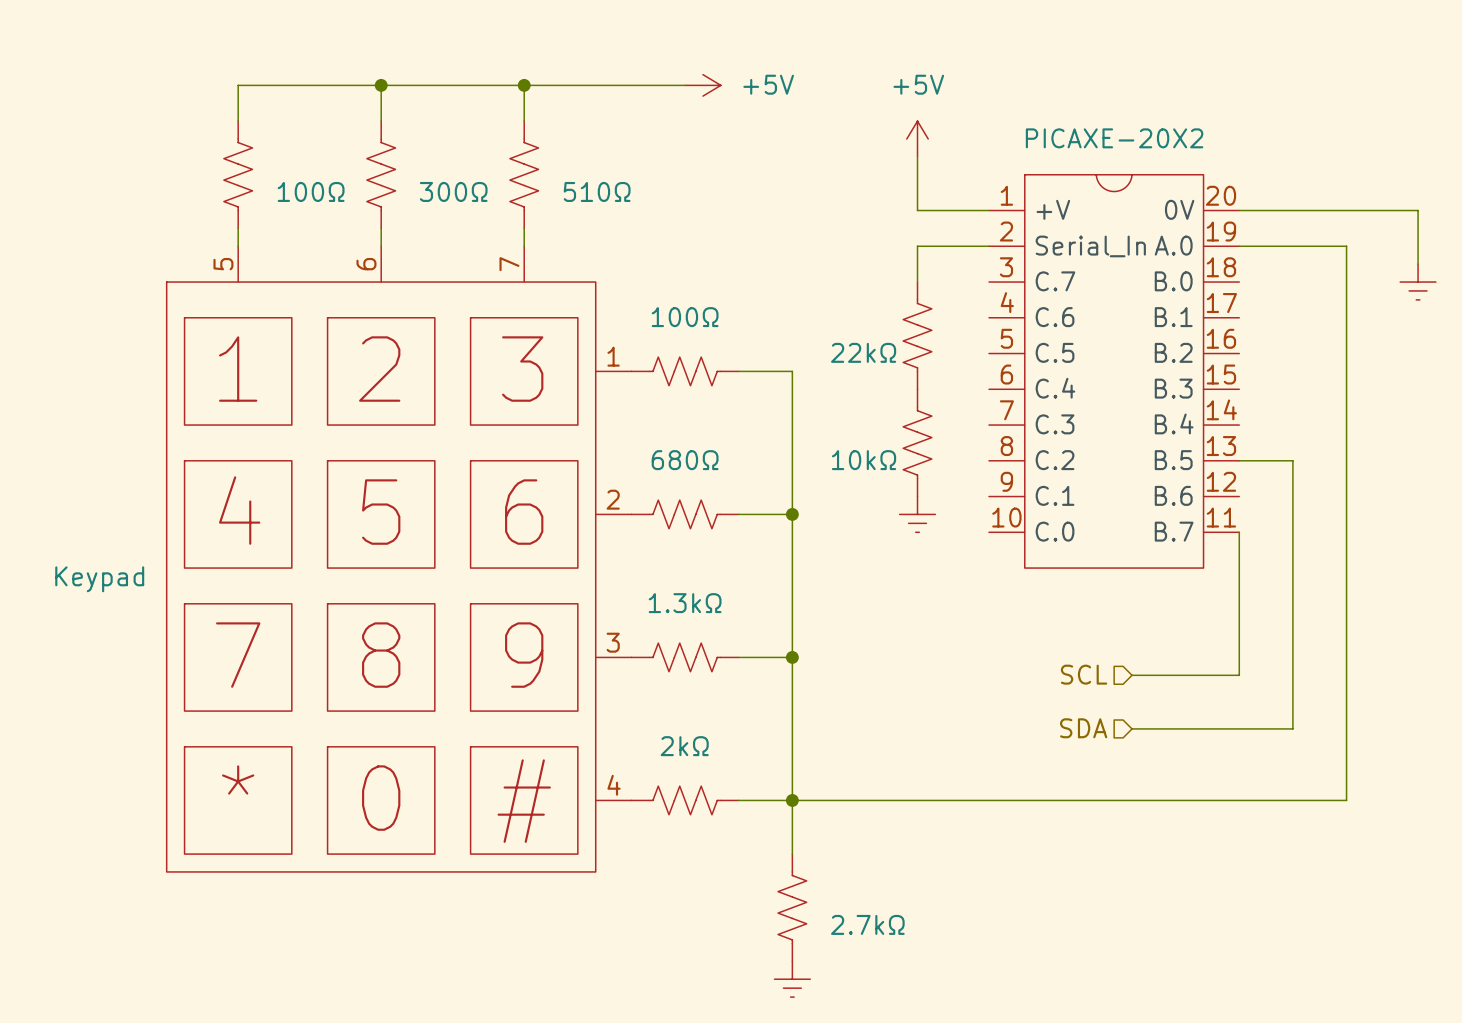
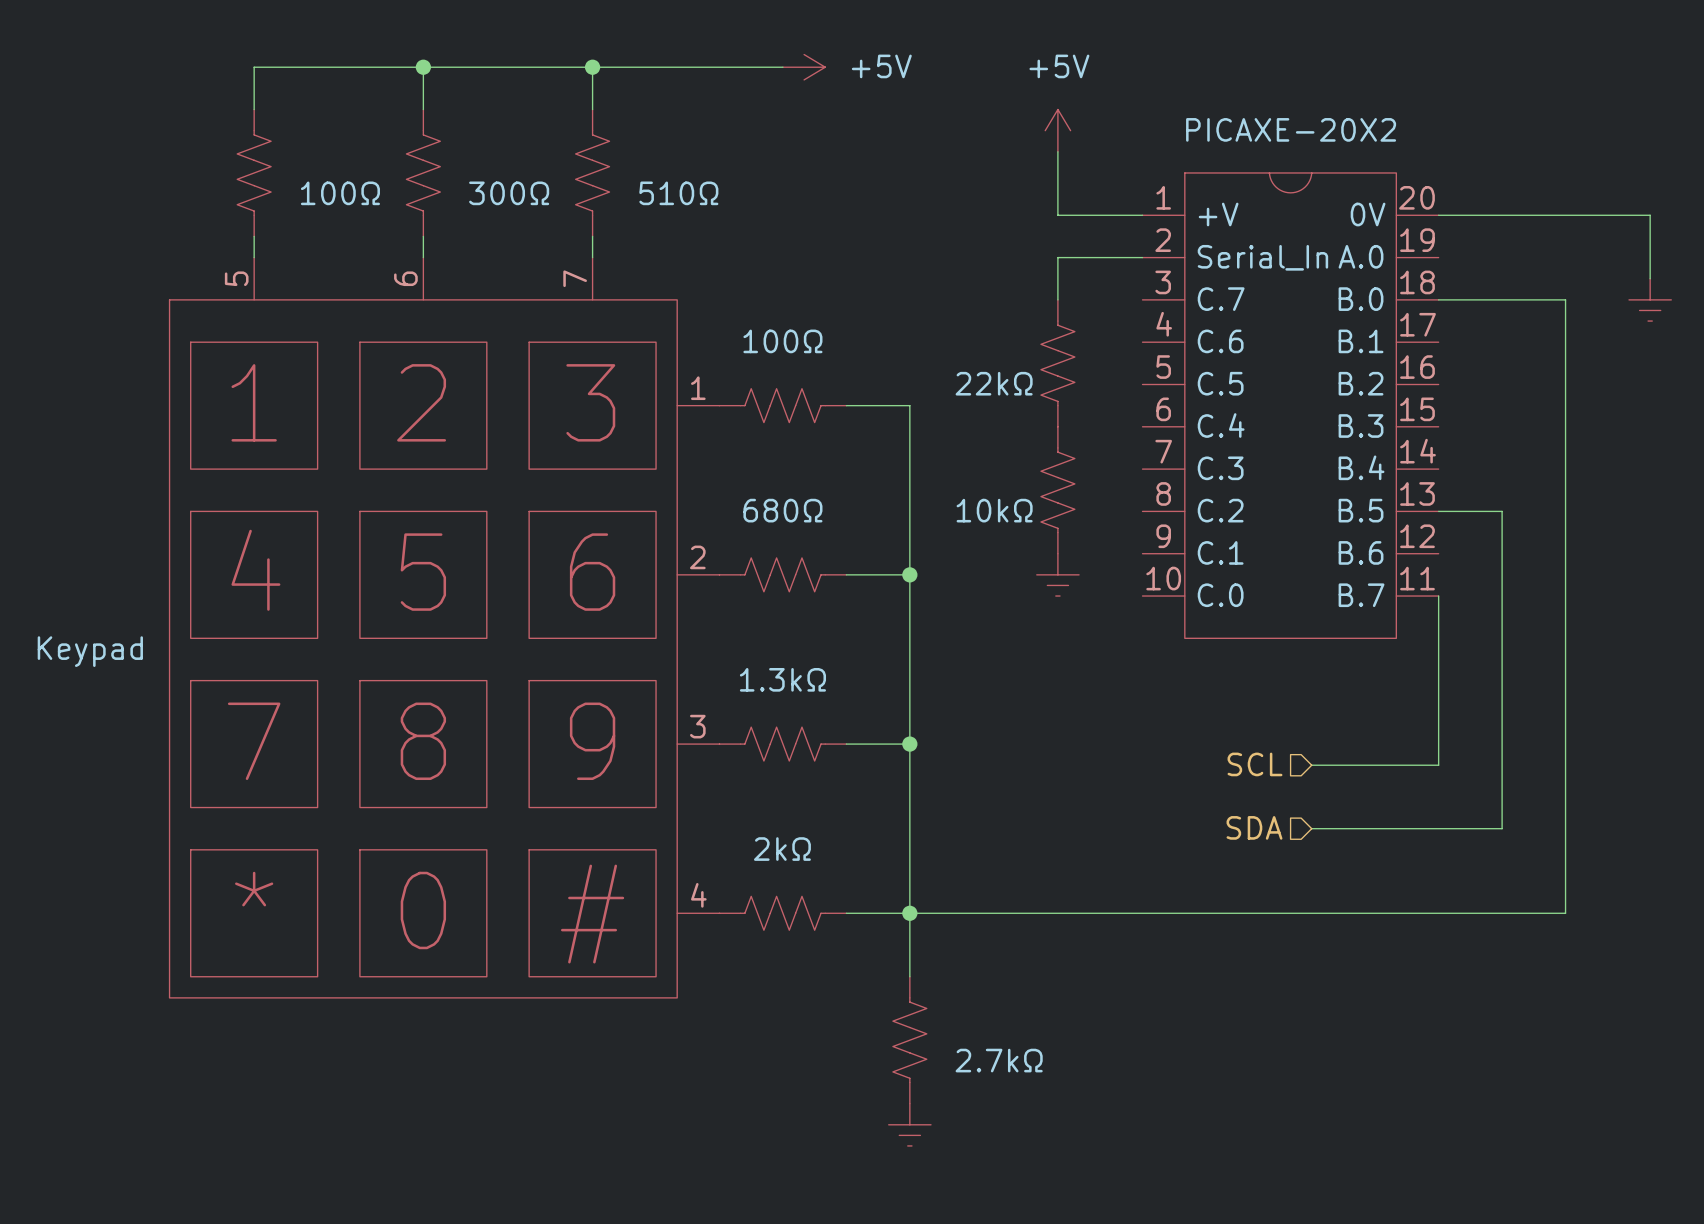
wire: (1239, 246) (1346, 246) (1346, 282) -> (1438, 299) (1565, 299)

